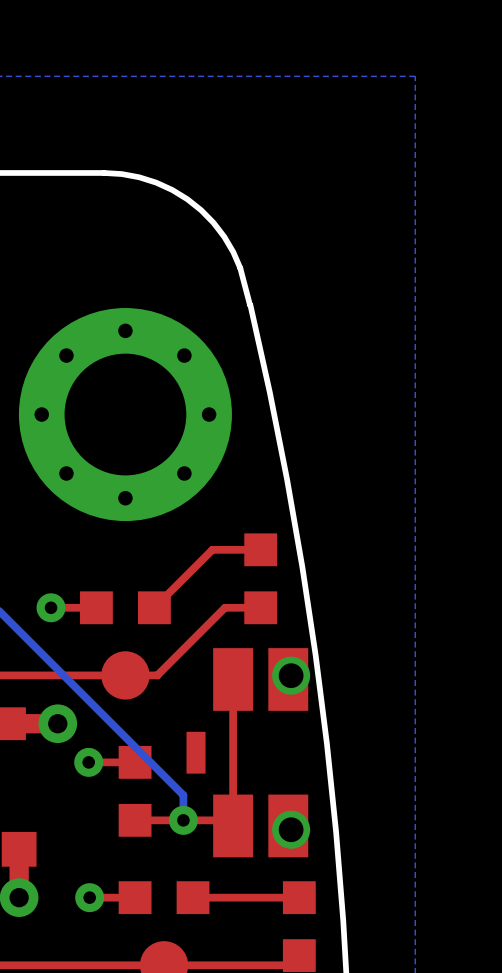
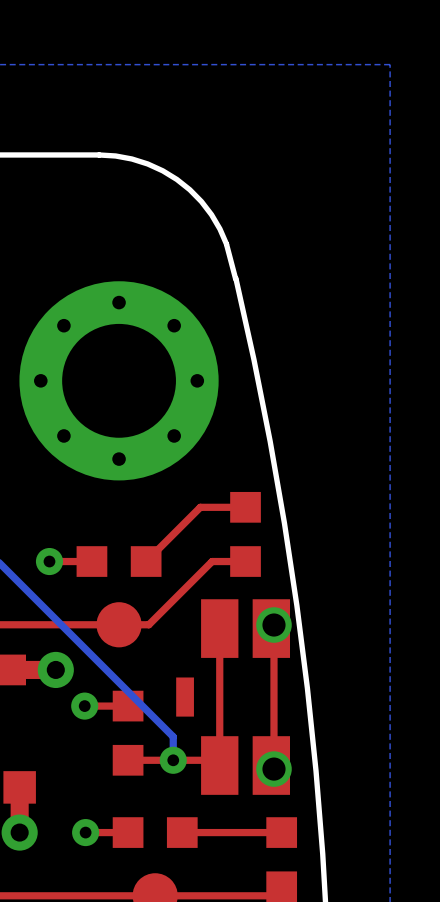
top track: none -> (273, 625) (273, 771)

